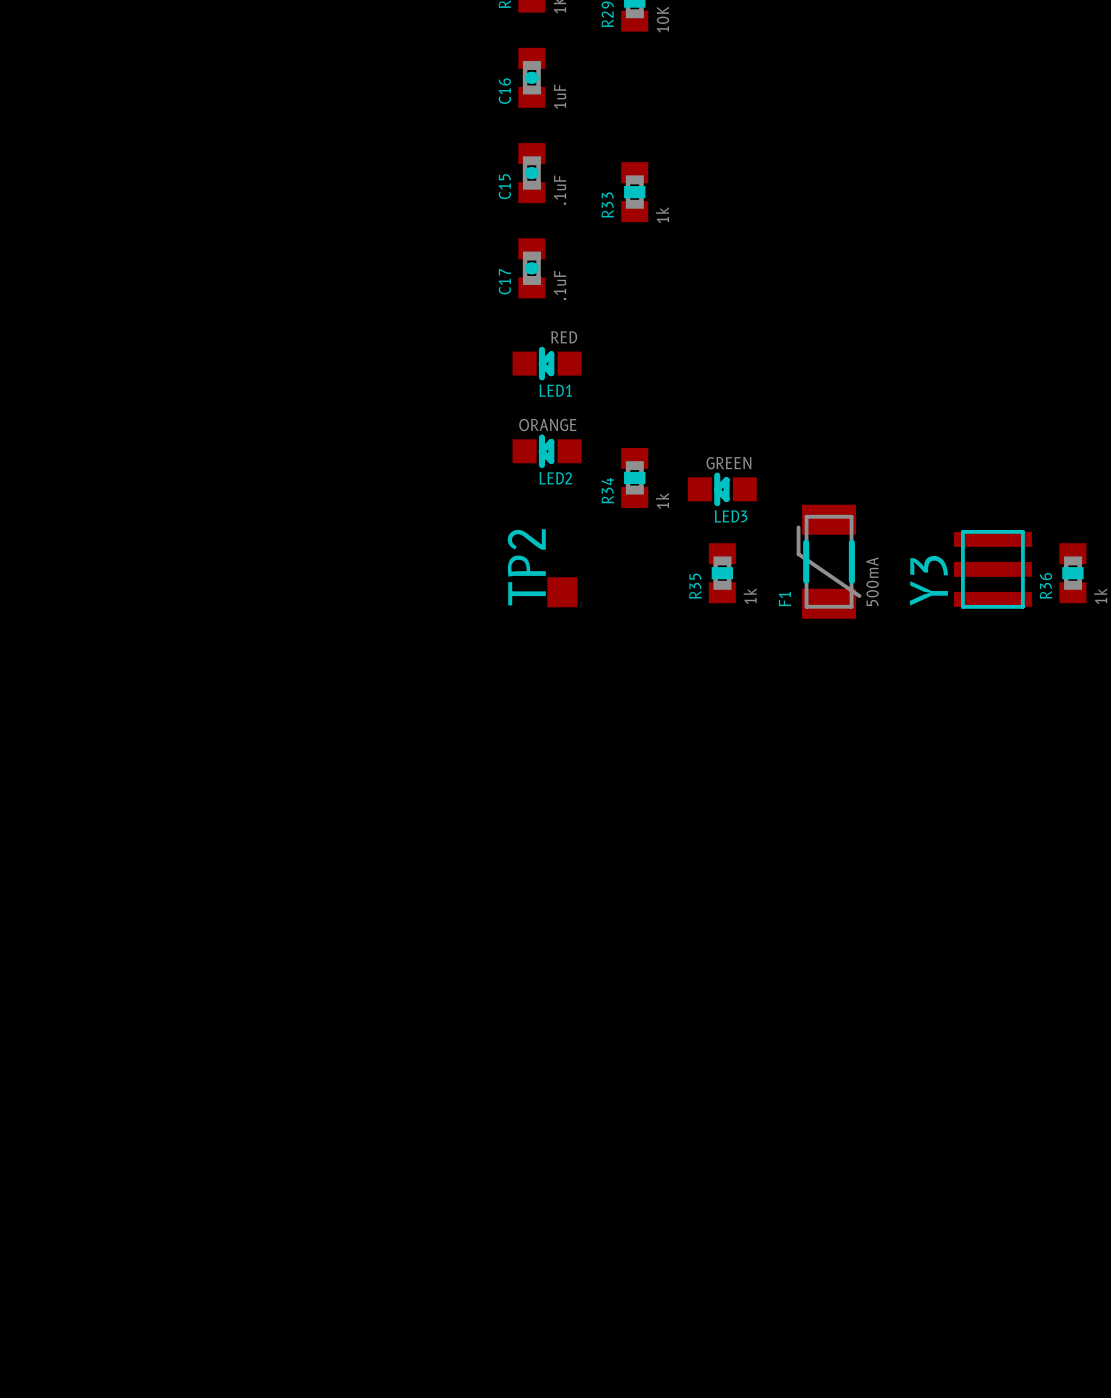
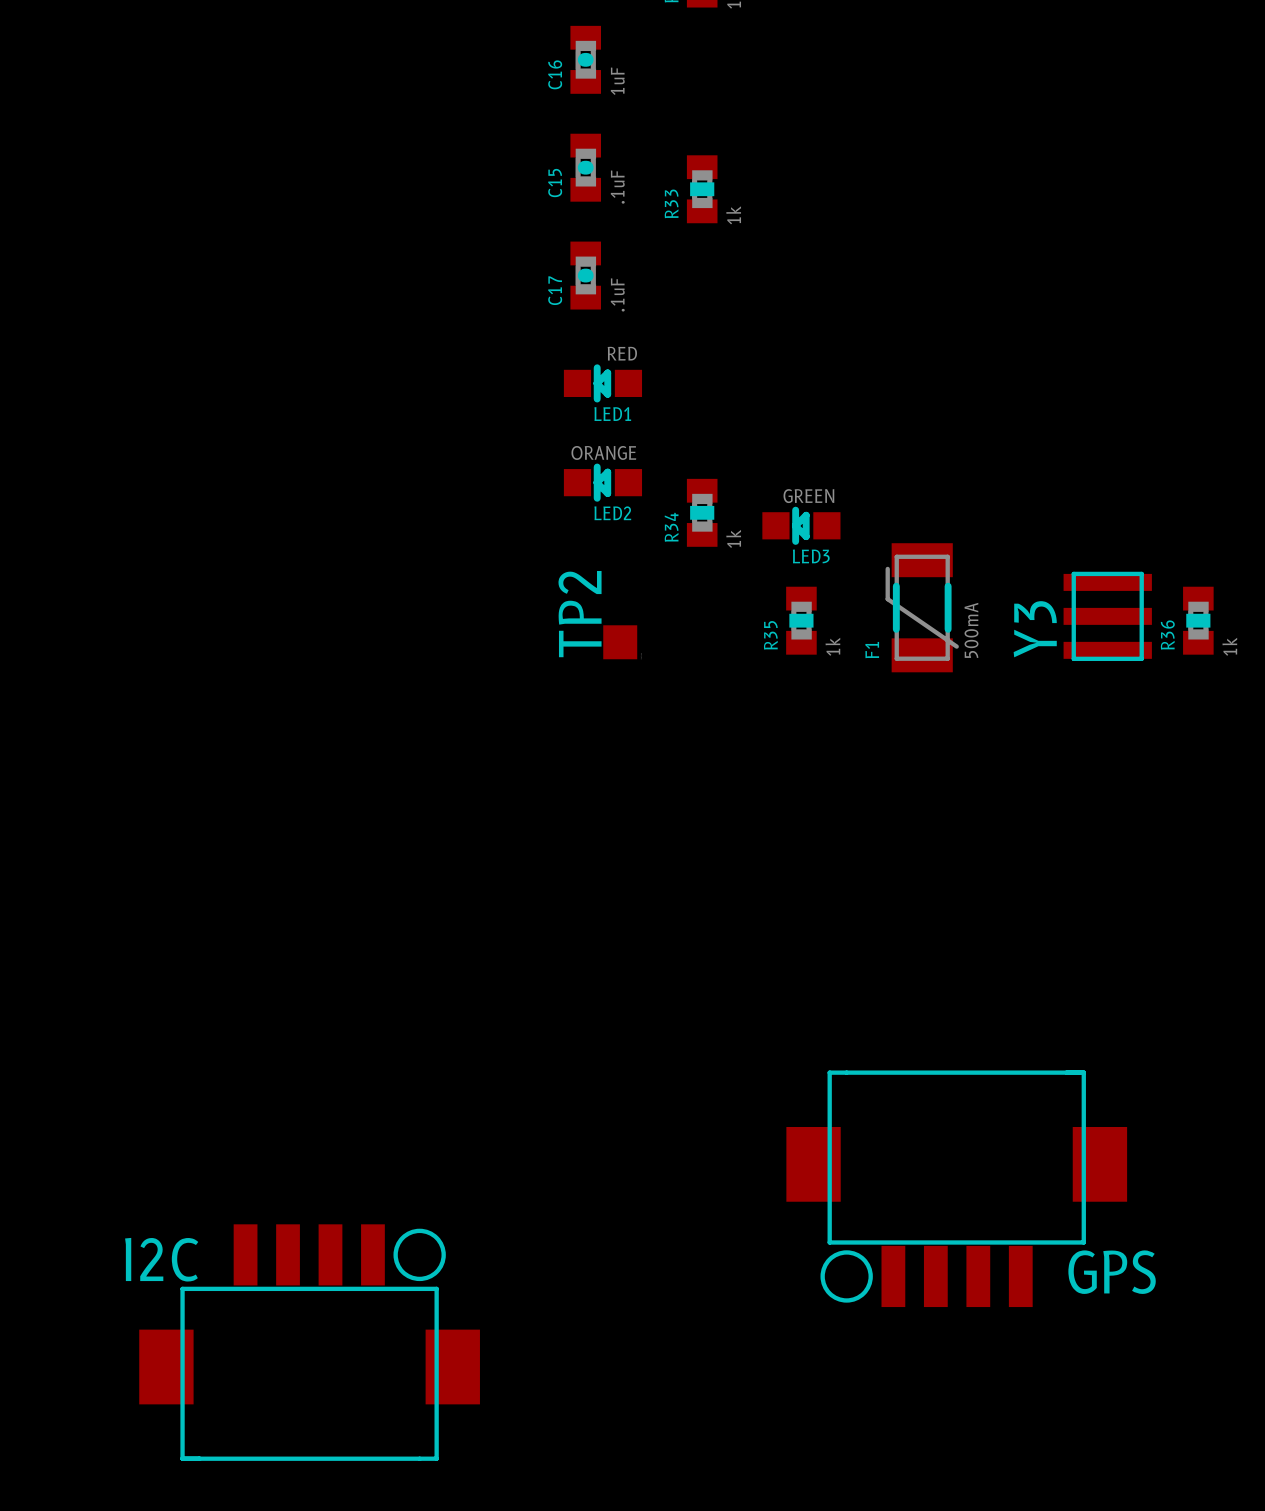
GPS: none -> (956, 1188)
I2C: none -> (309, 1342)

